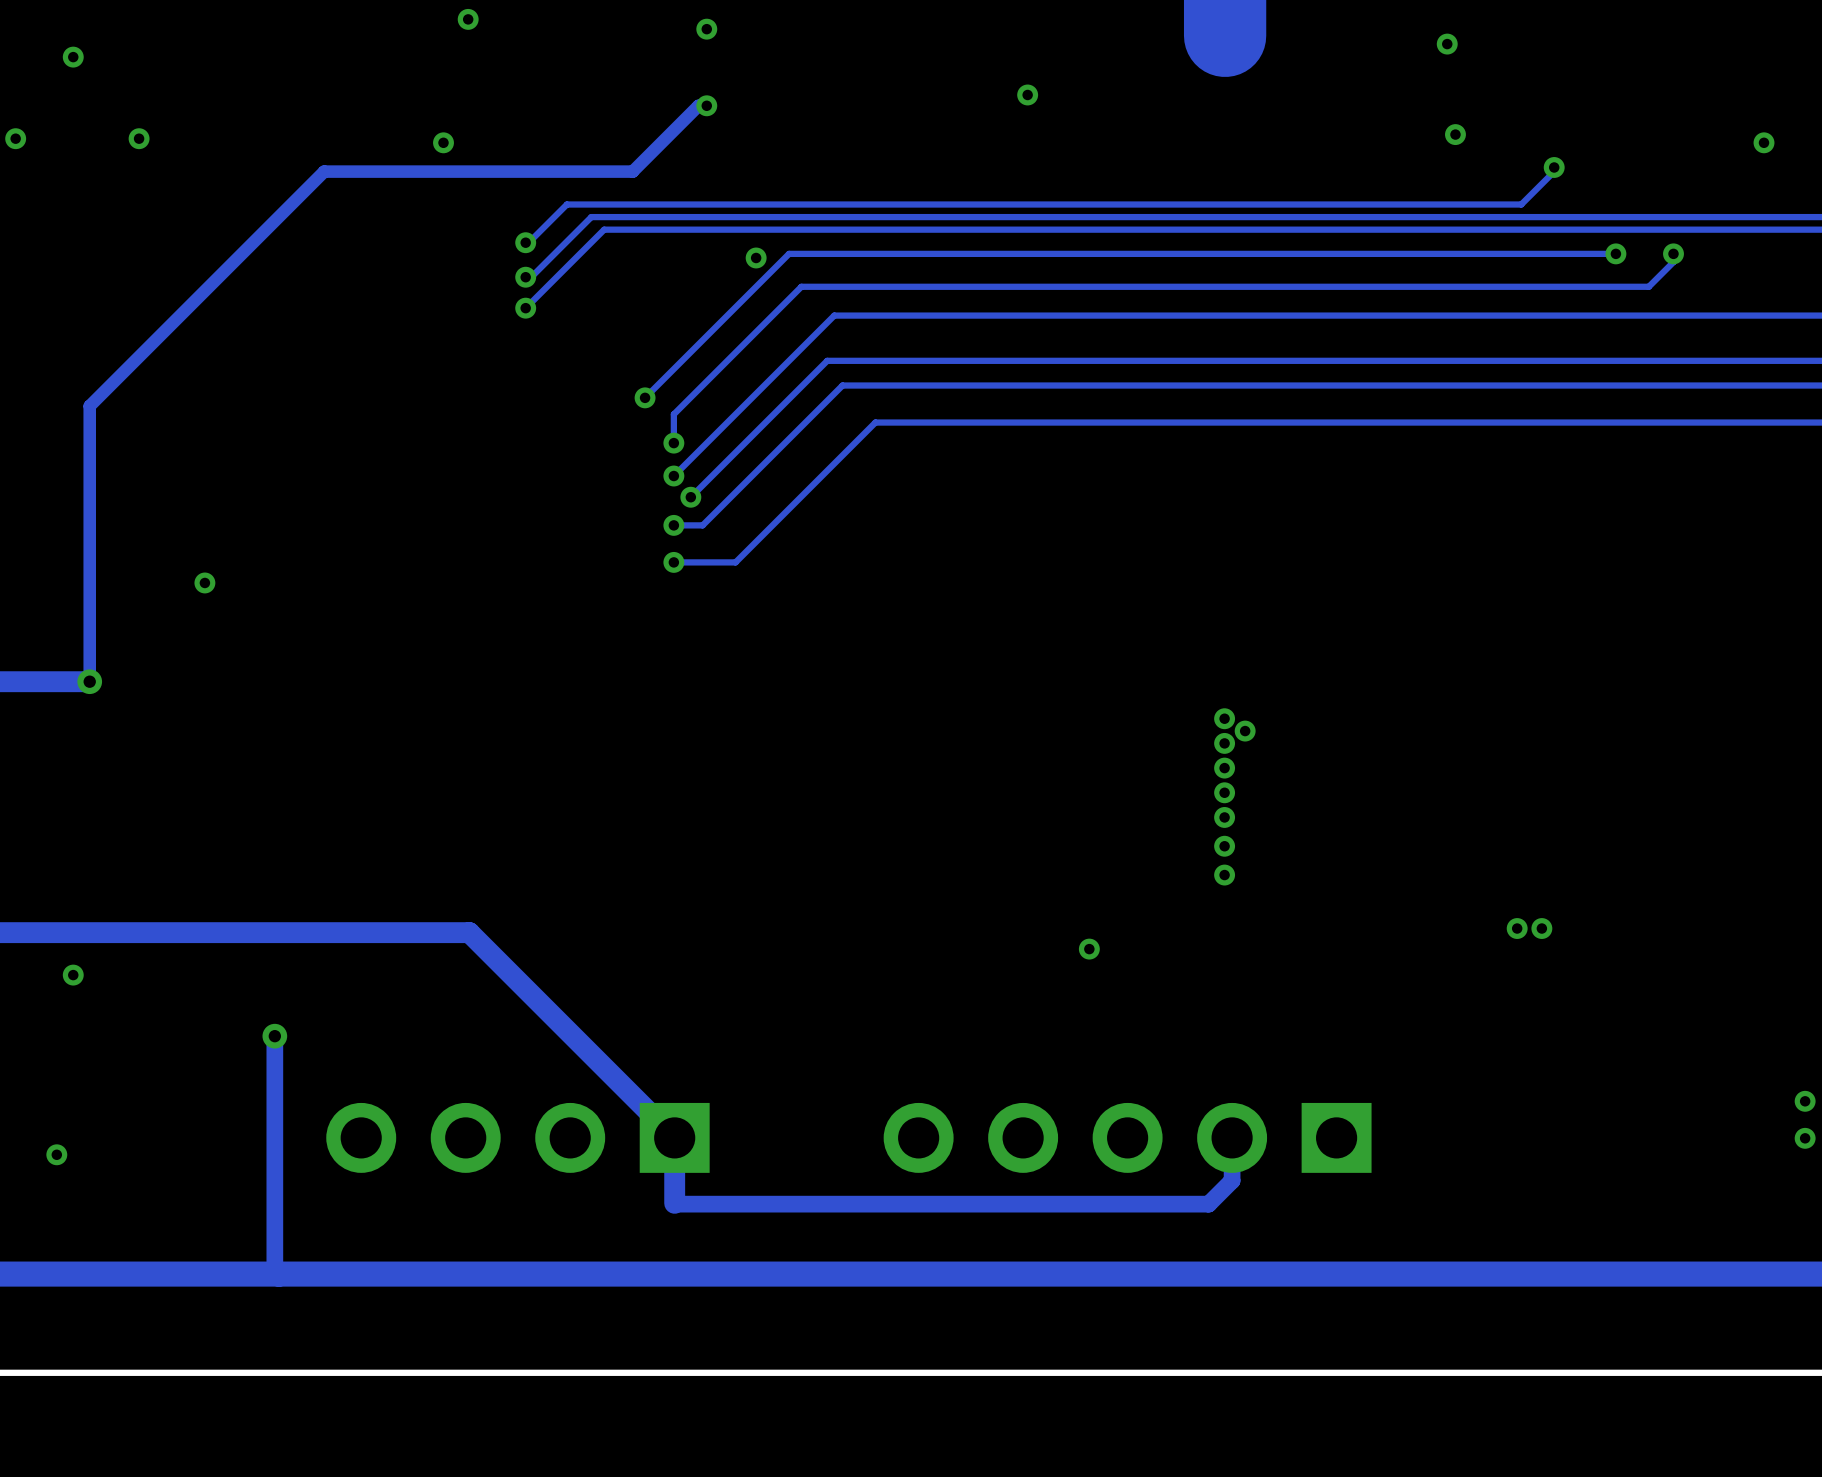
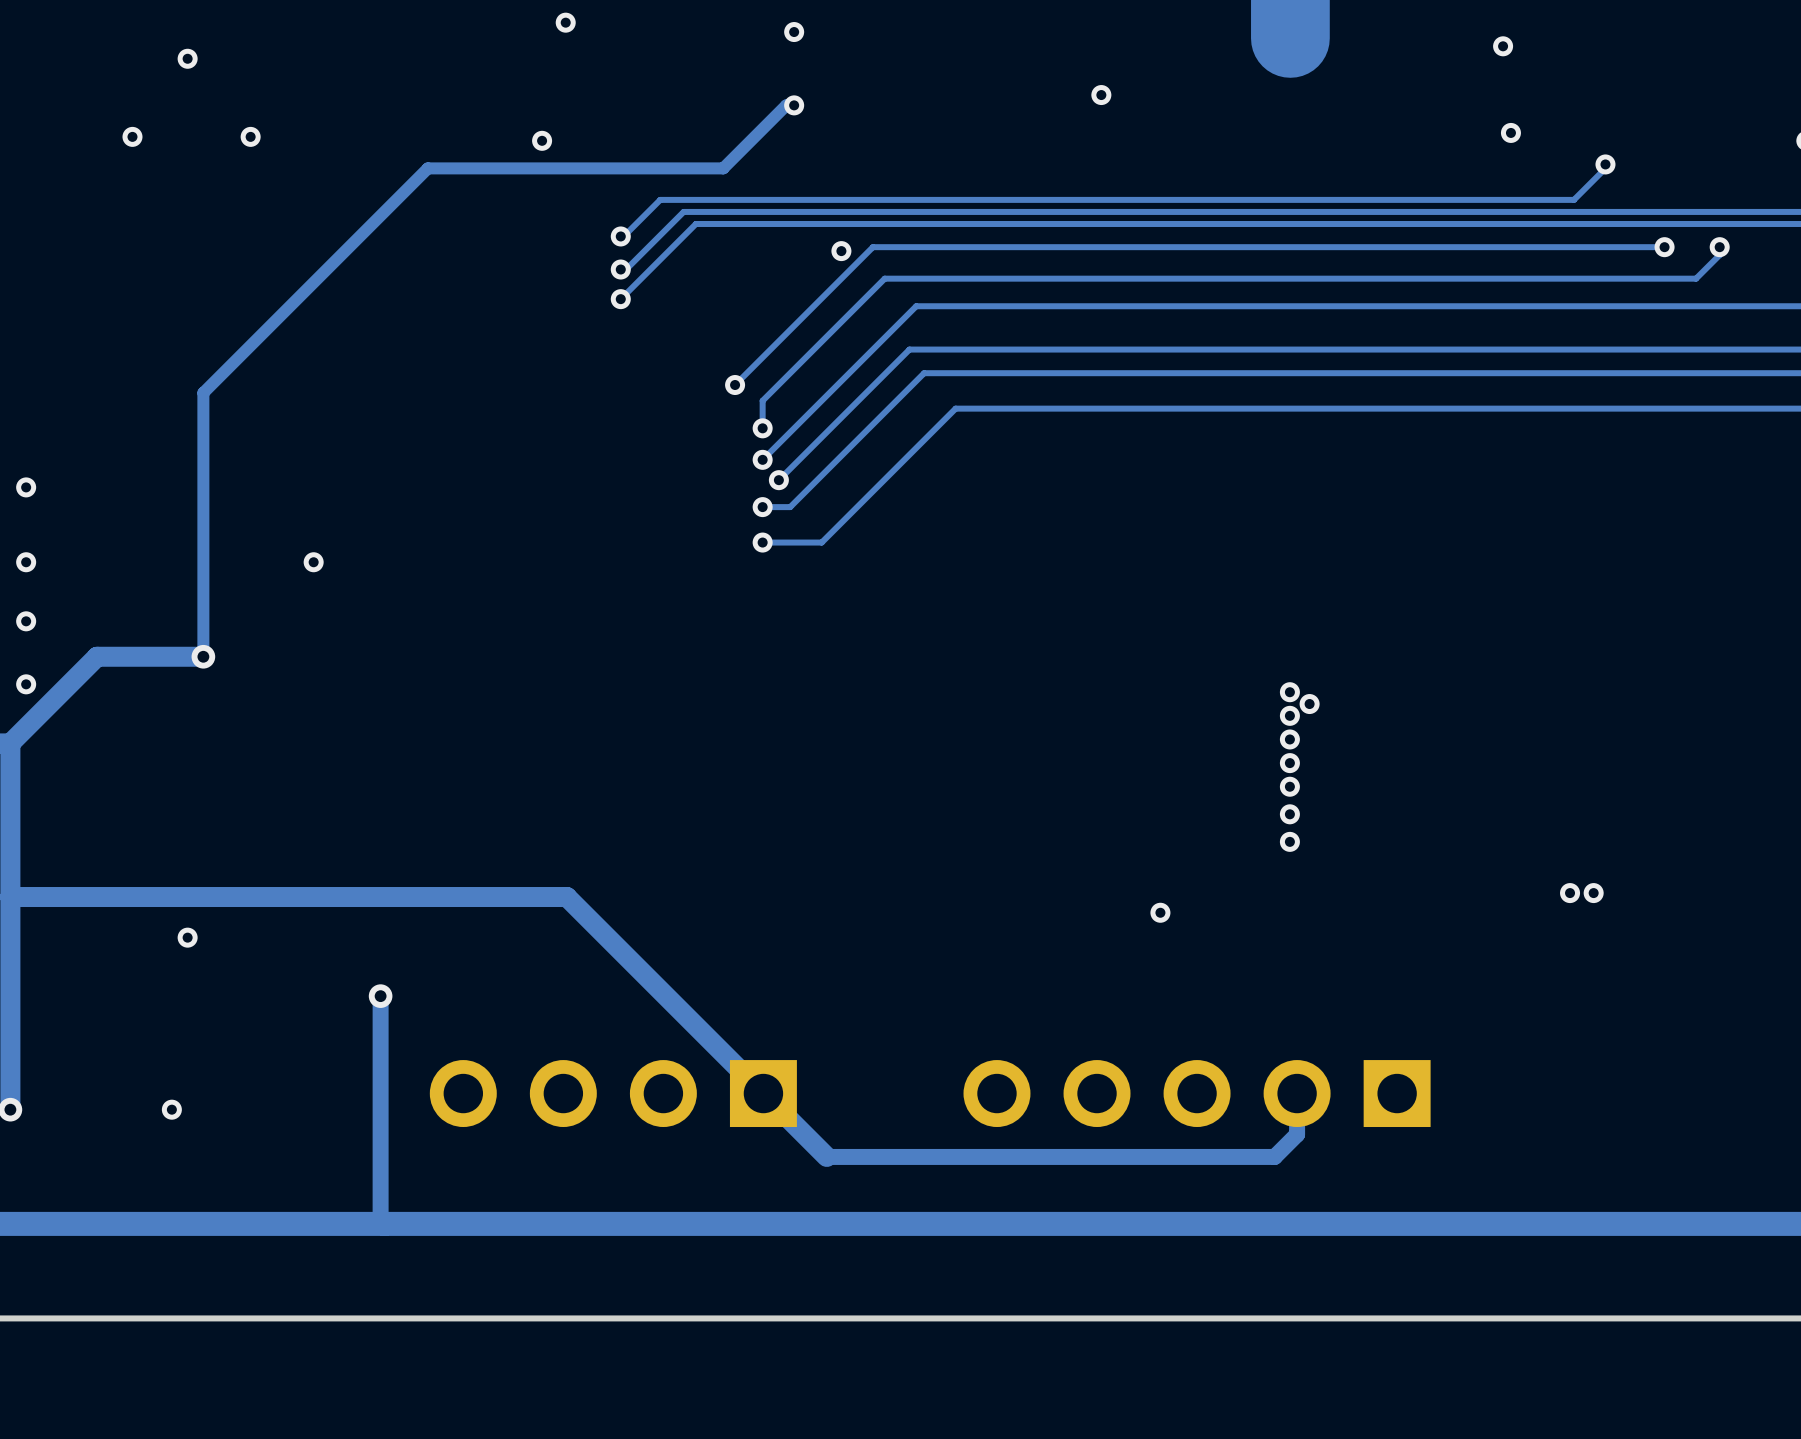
track: (674, 1137) (673, 1204) (740, 1204) -> (763, 1093) (826, 1156)

